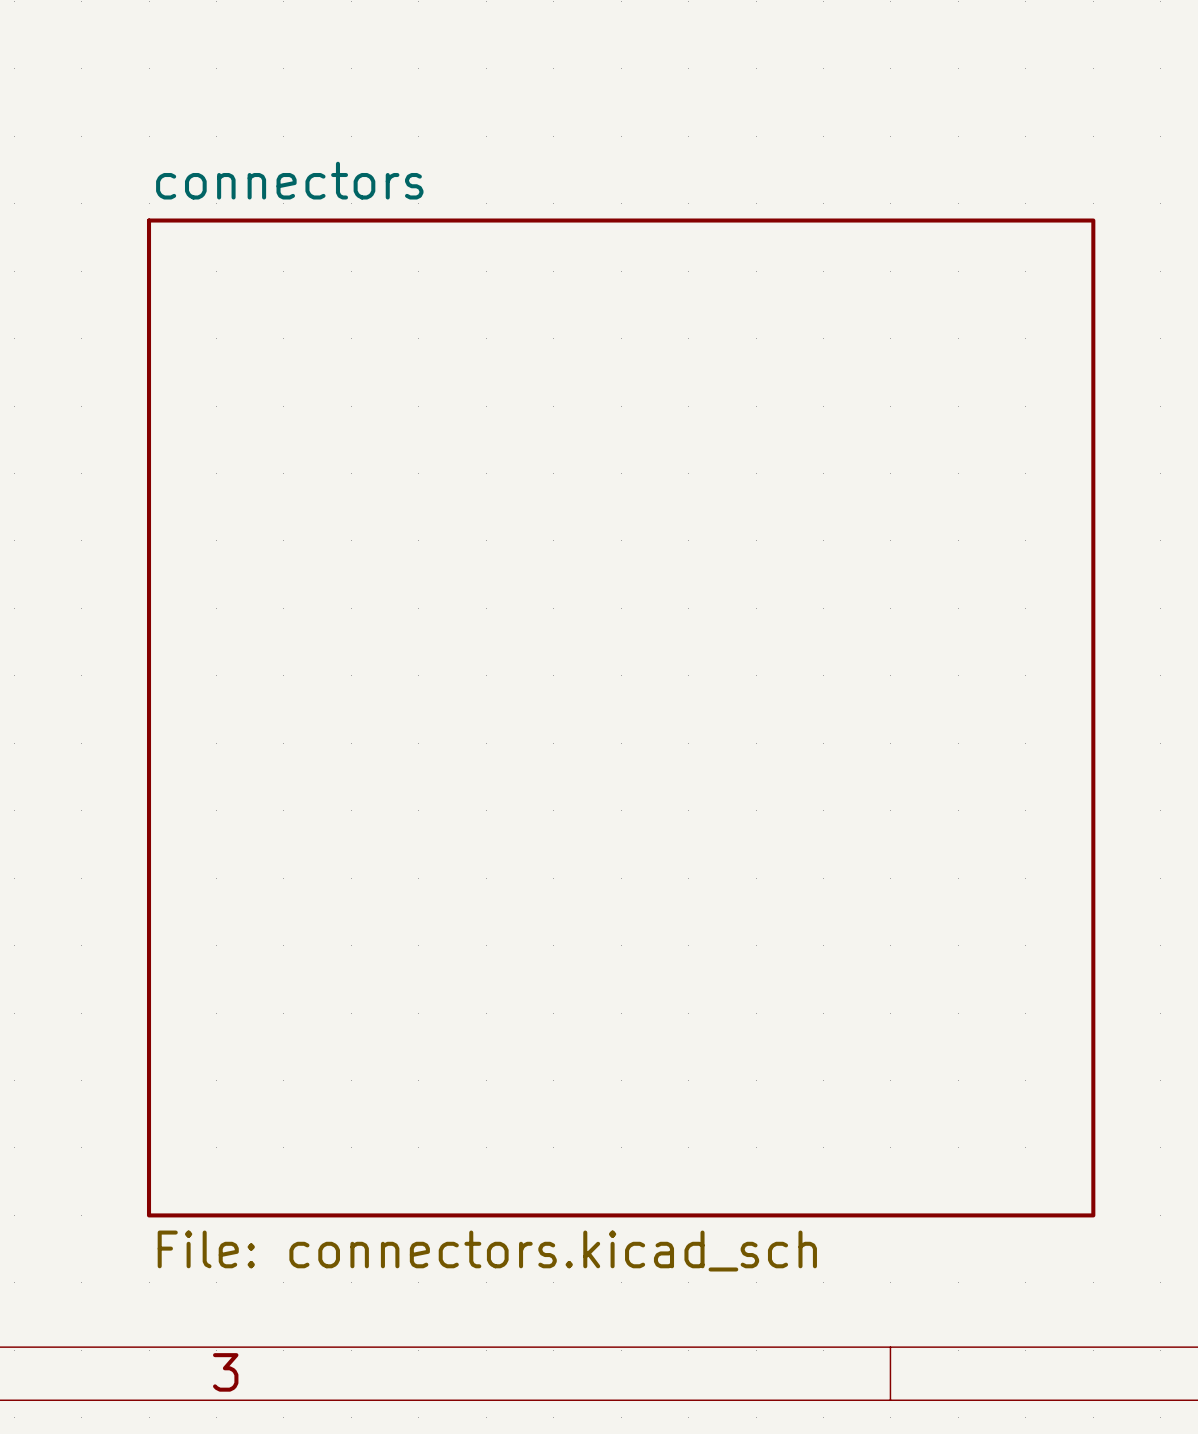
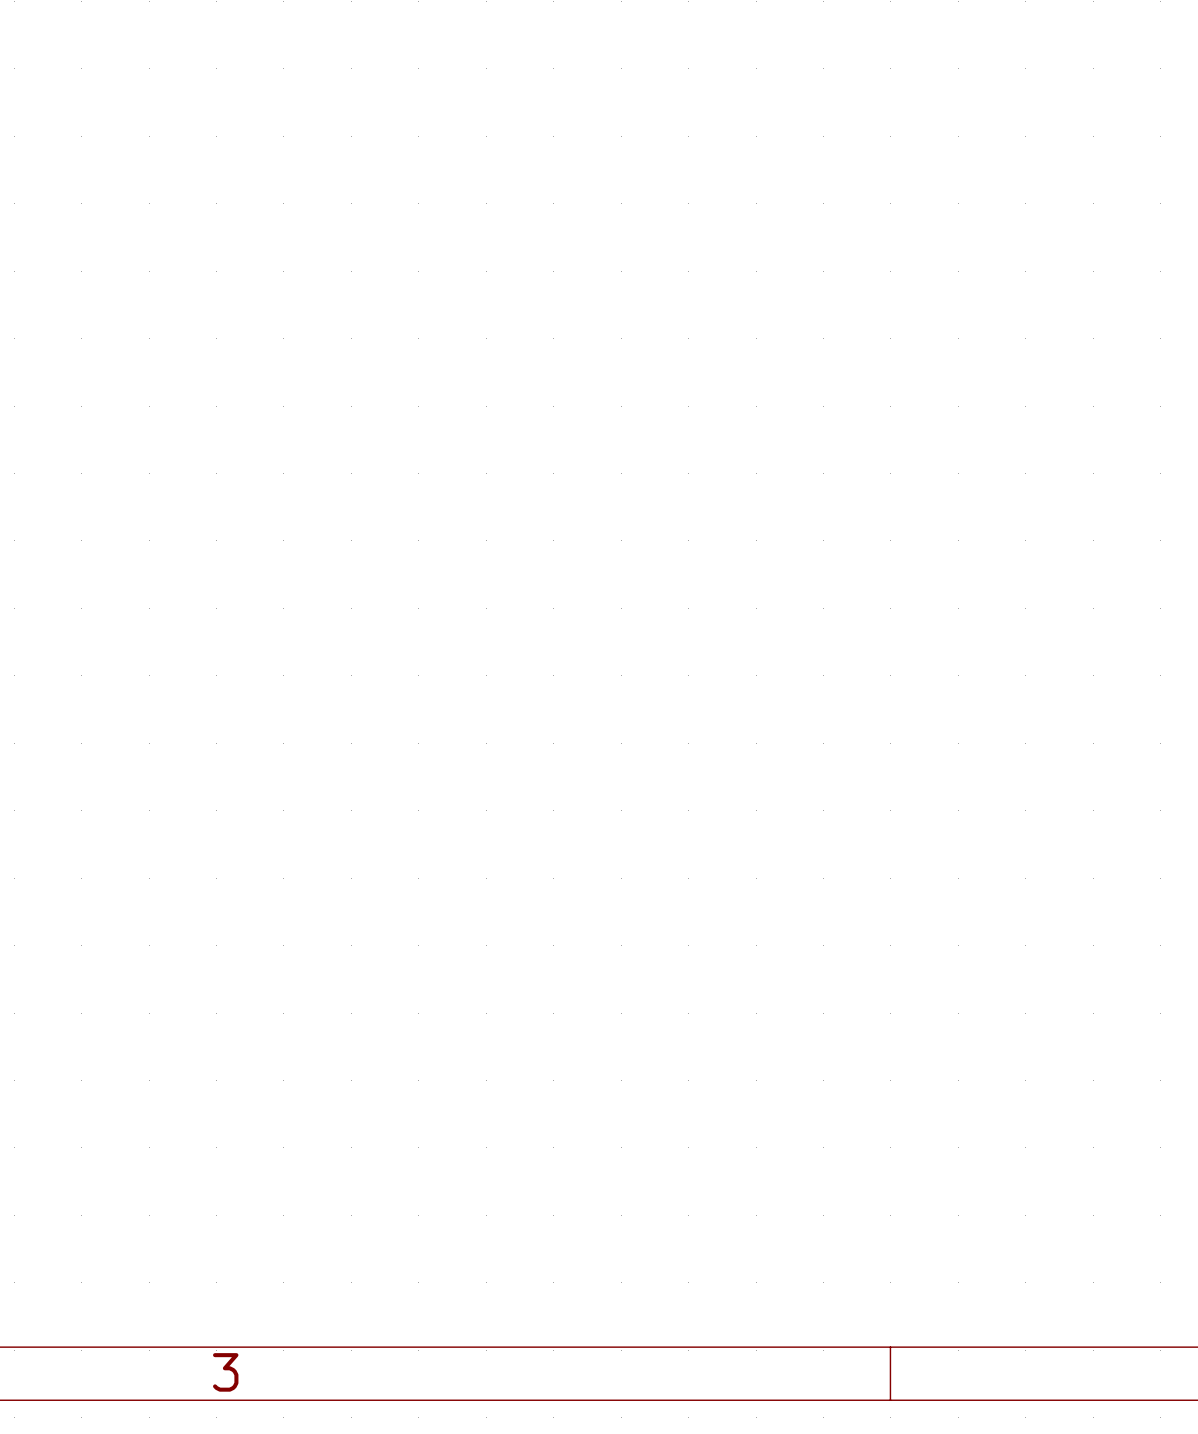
sheet connectors: File: connectors.kicad_sch (621, 717) -> none

